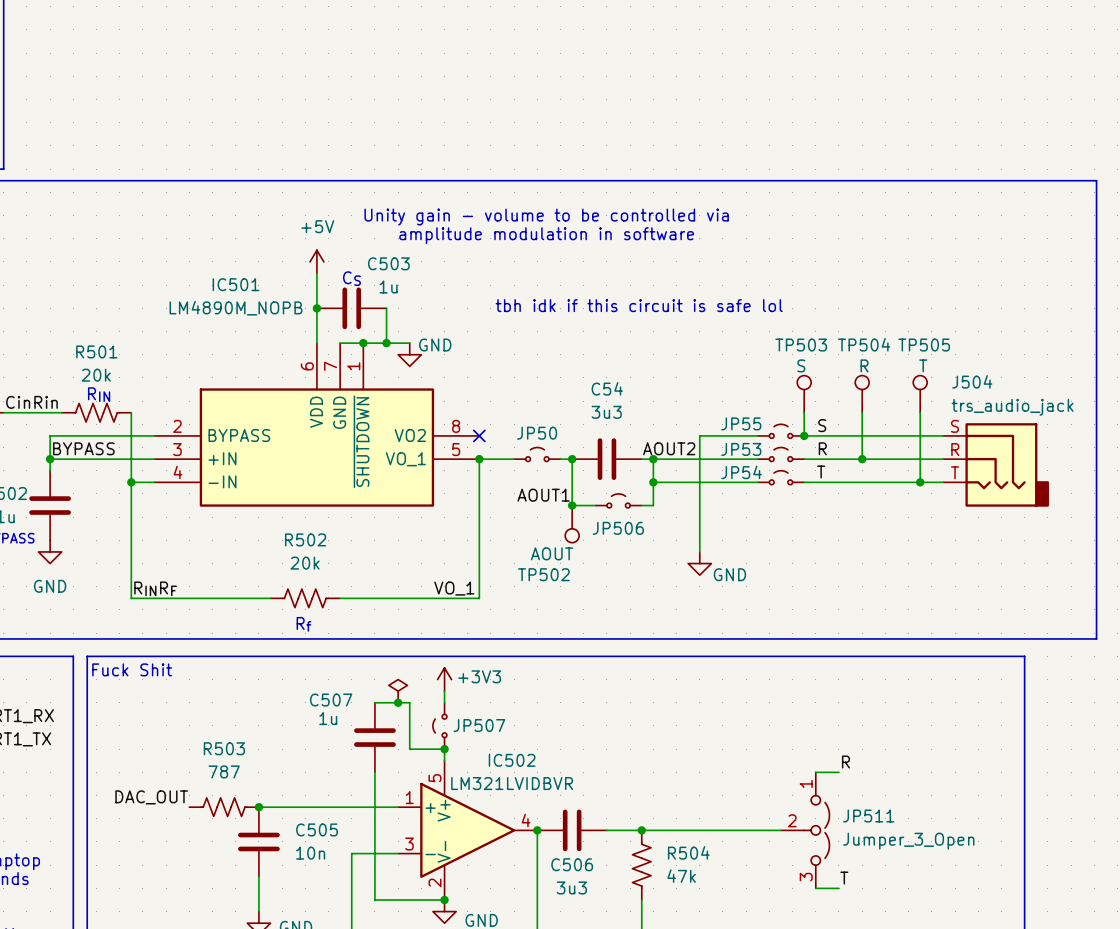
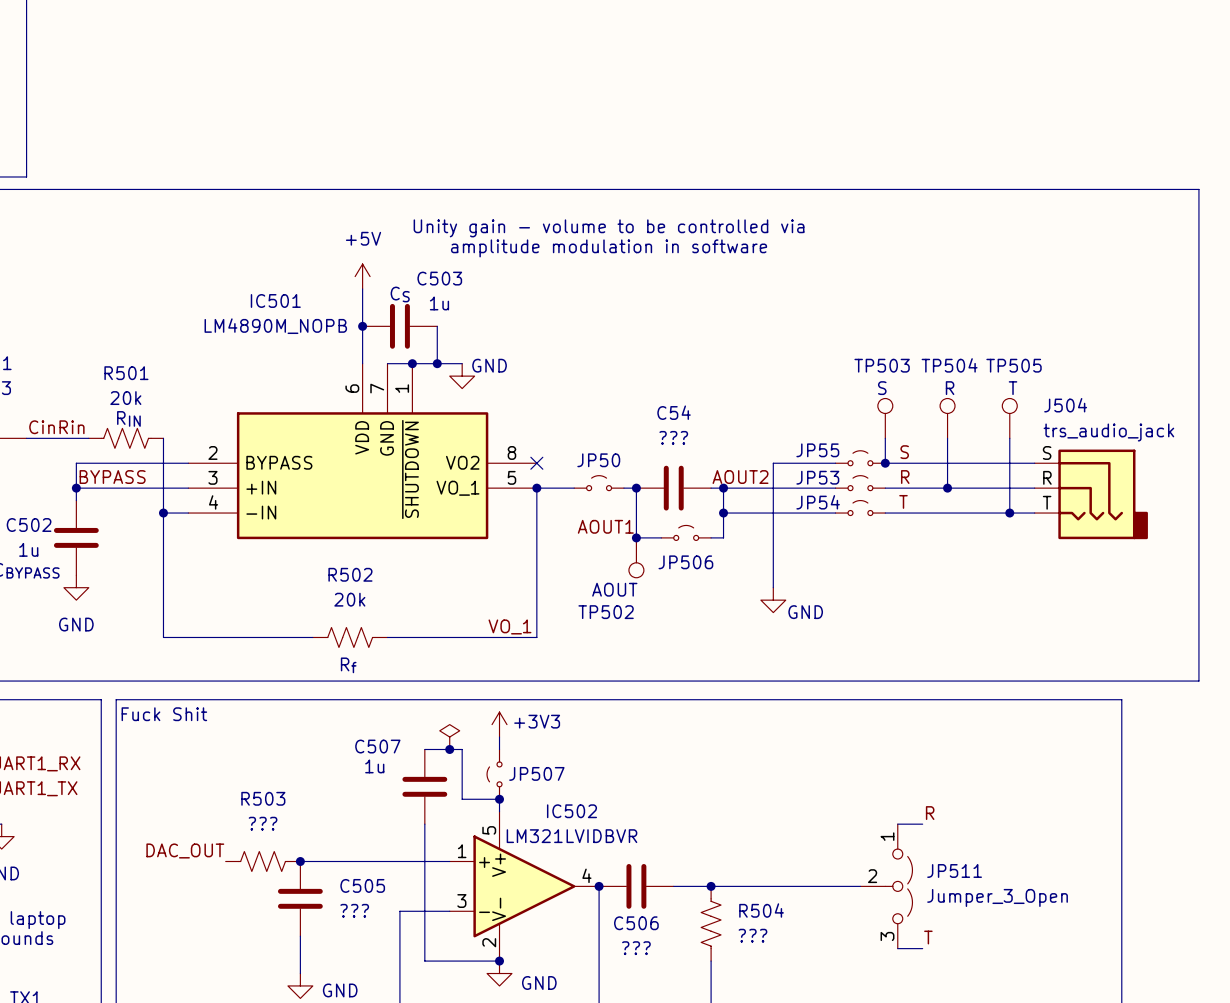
text: tbh idk if this circuit is safe lol (639, 305) -> none
C54 value: 3u3 (606, 412) -> ??? (673, 437)
label: RINRF (155, 588) -> none
R503 value: 787 (224, 771) -> ??? (263, 823)
C505 value: 10n (310, 853) -> ??? (354, 910)
R504 value: 47k (681, 876) -> ??? (752, 935)
C506 value: 3u3 (571, 887) -> ??? (636, 948)

